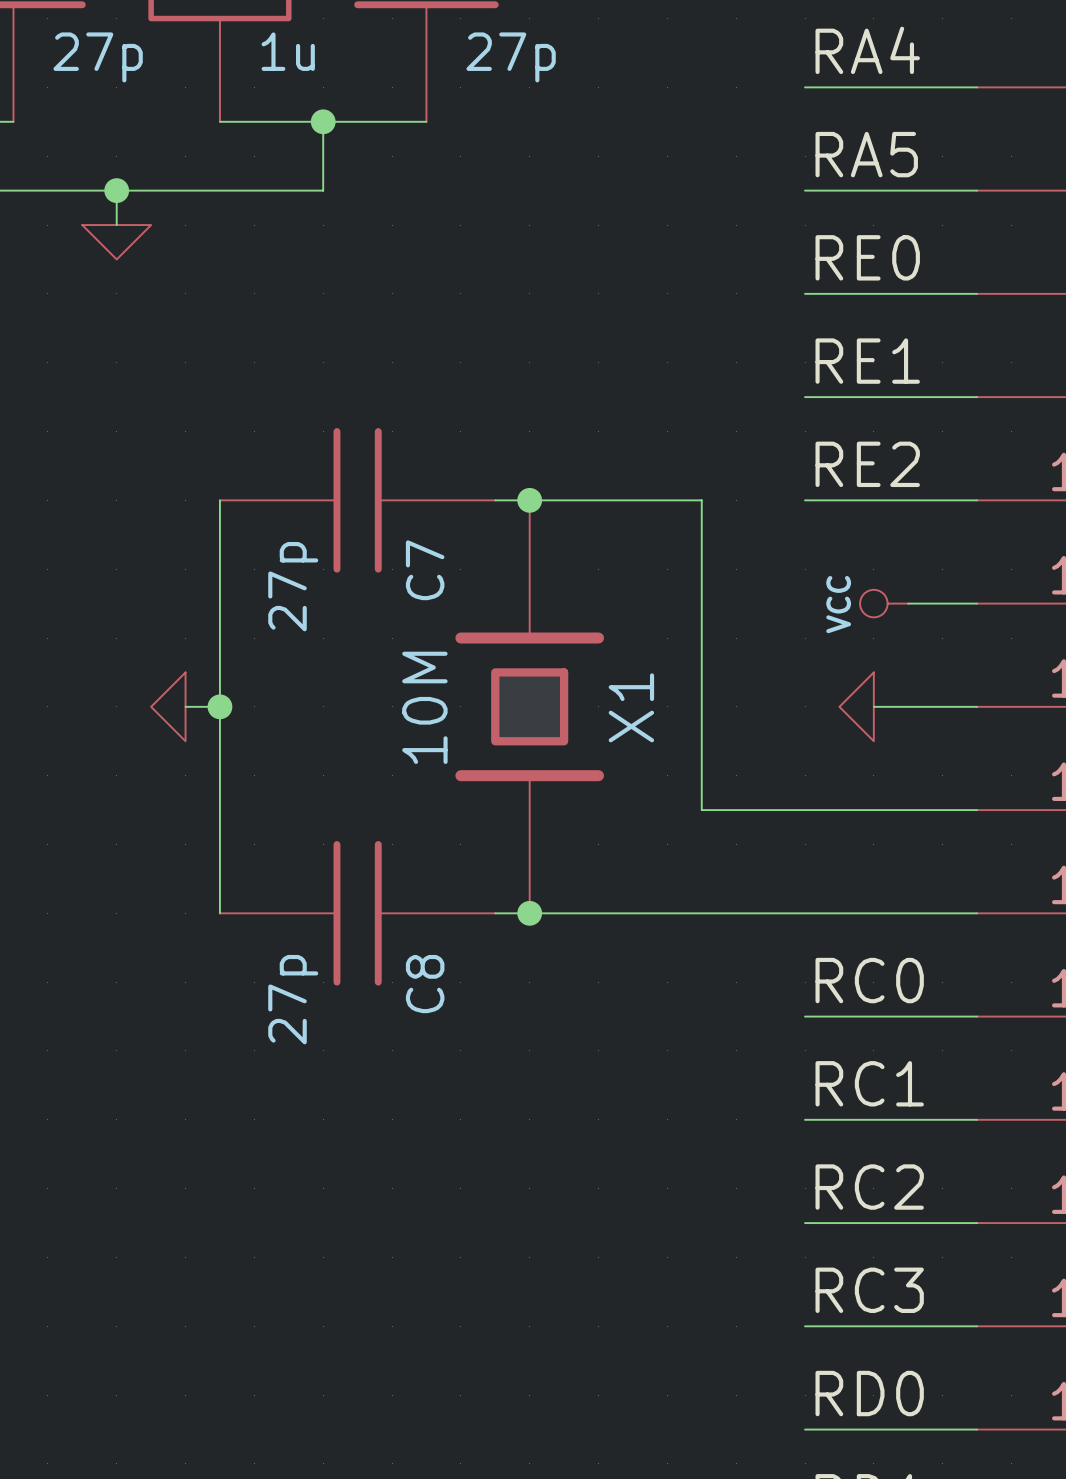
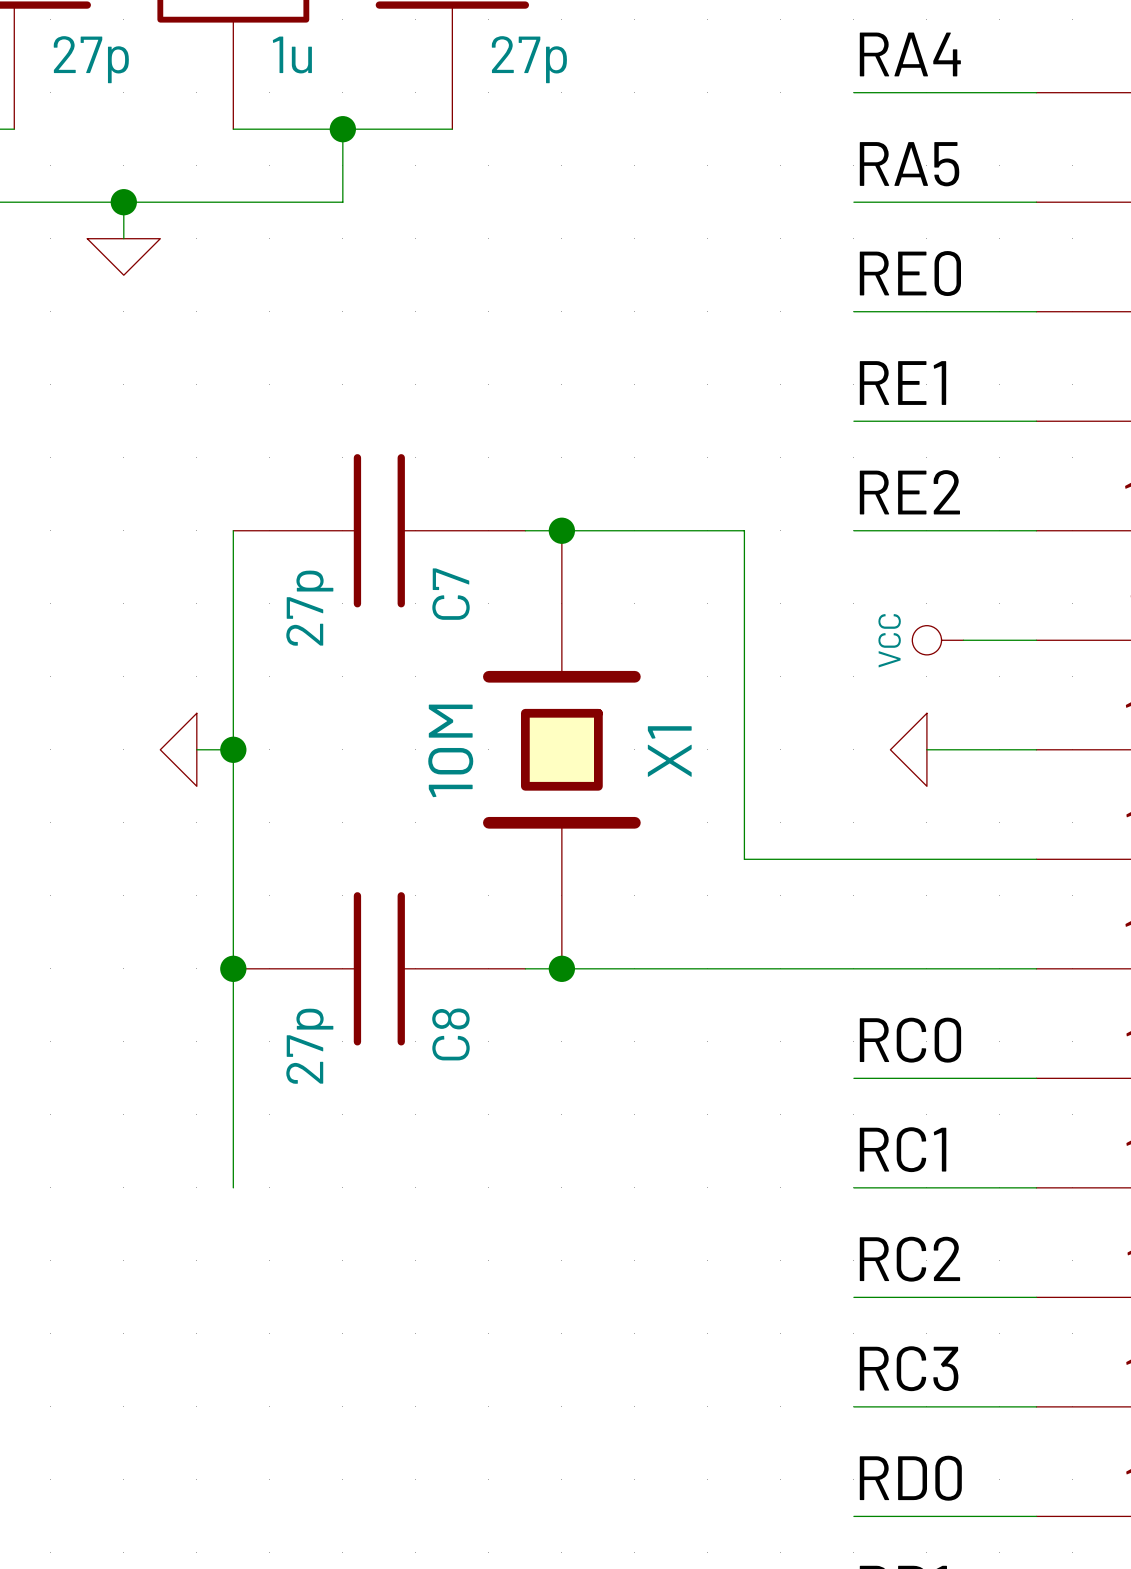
wire: none -> (233, 968) (233, 1187)
junction: none -> (233, 968)

